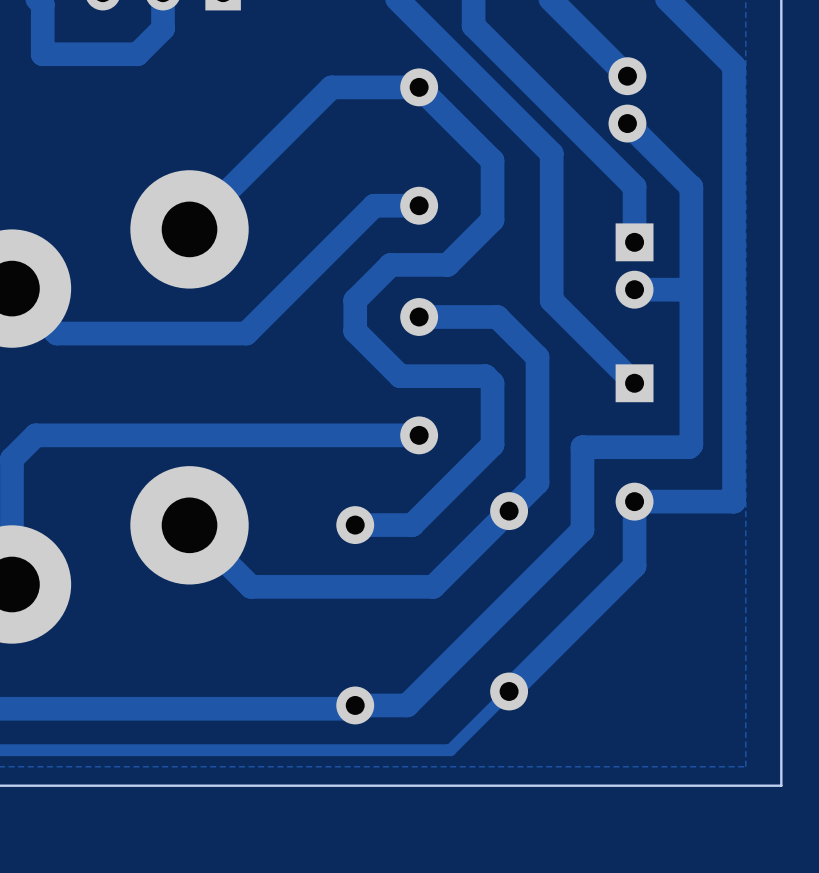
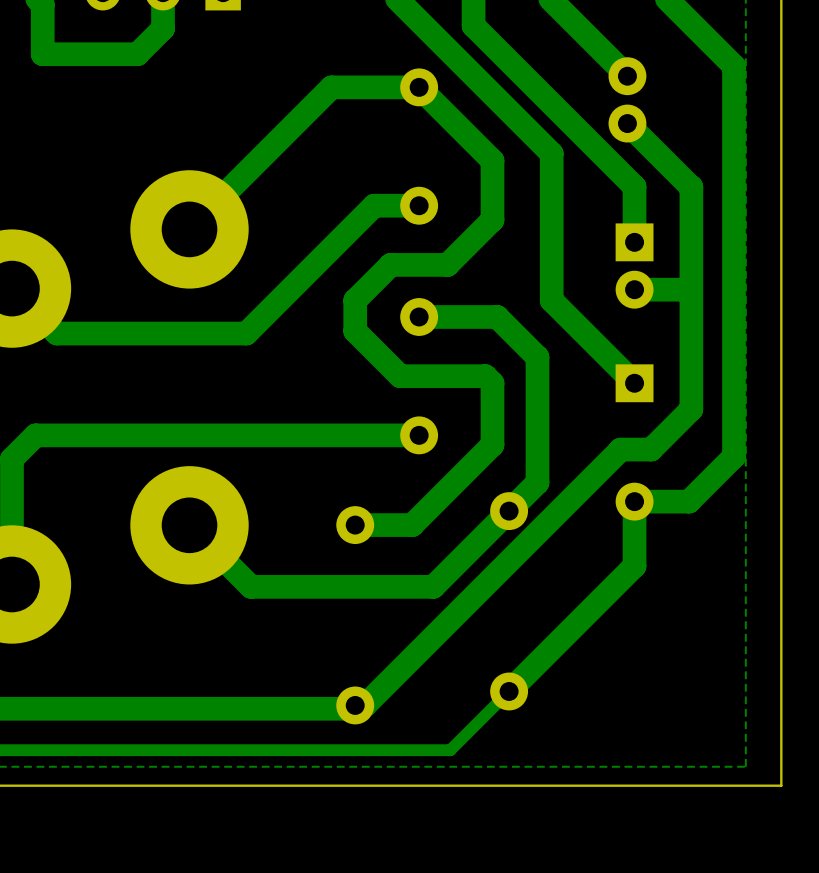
track: (691, 409) (691, 444) (689, 447) (582, 447) (582, 530) (407, 705) (364, 705) -> (620, 450) (364, 705)
track: none -> (691, 409) (651, 449) (620, 449)
track: (733, 456) (733, 501) (689, 501) -> (733, 456) (689, 501)

